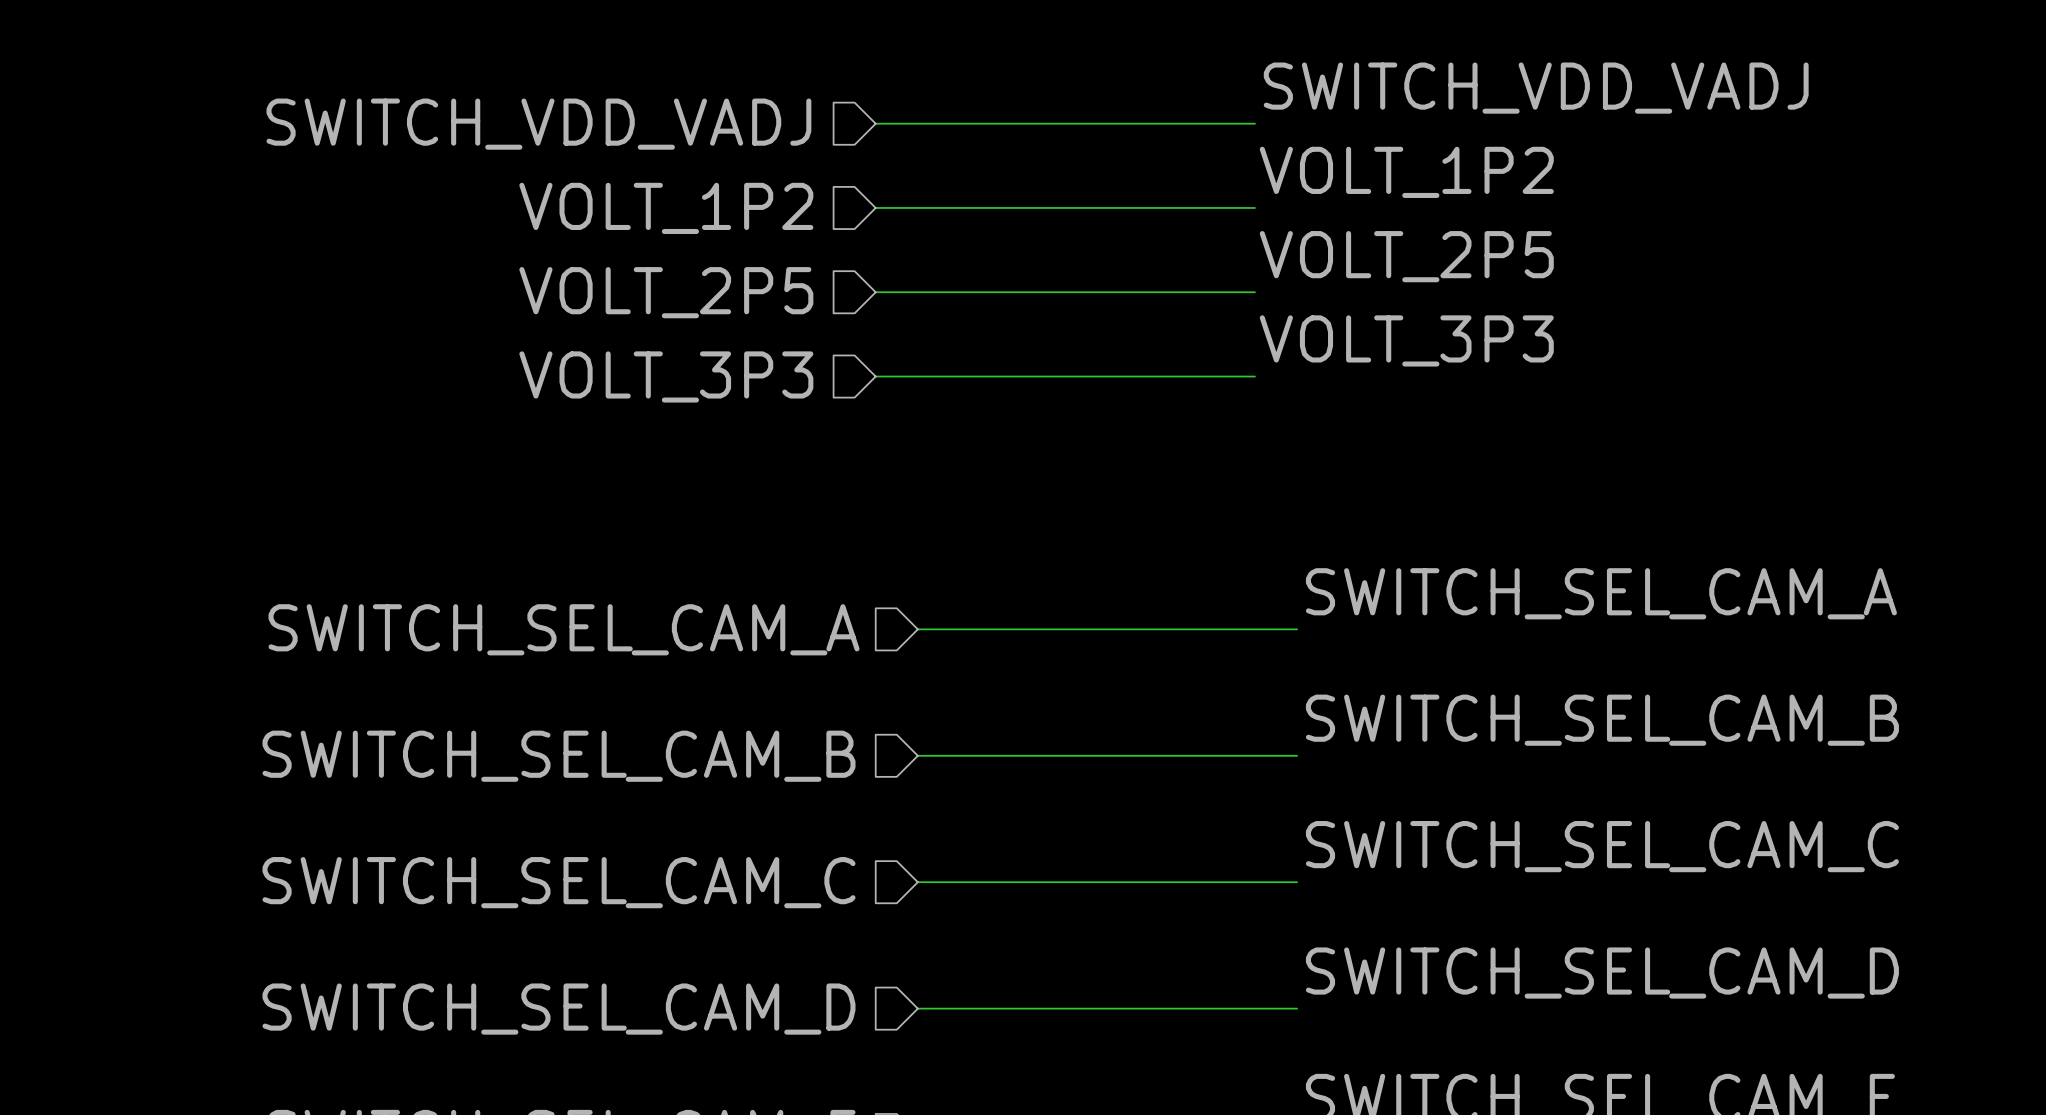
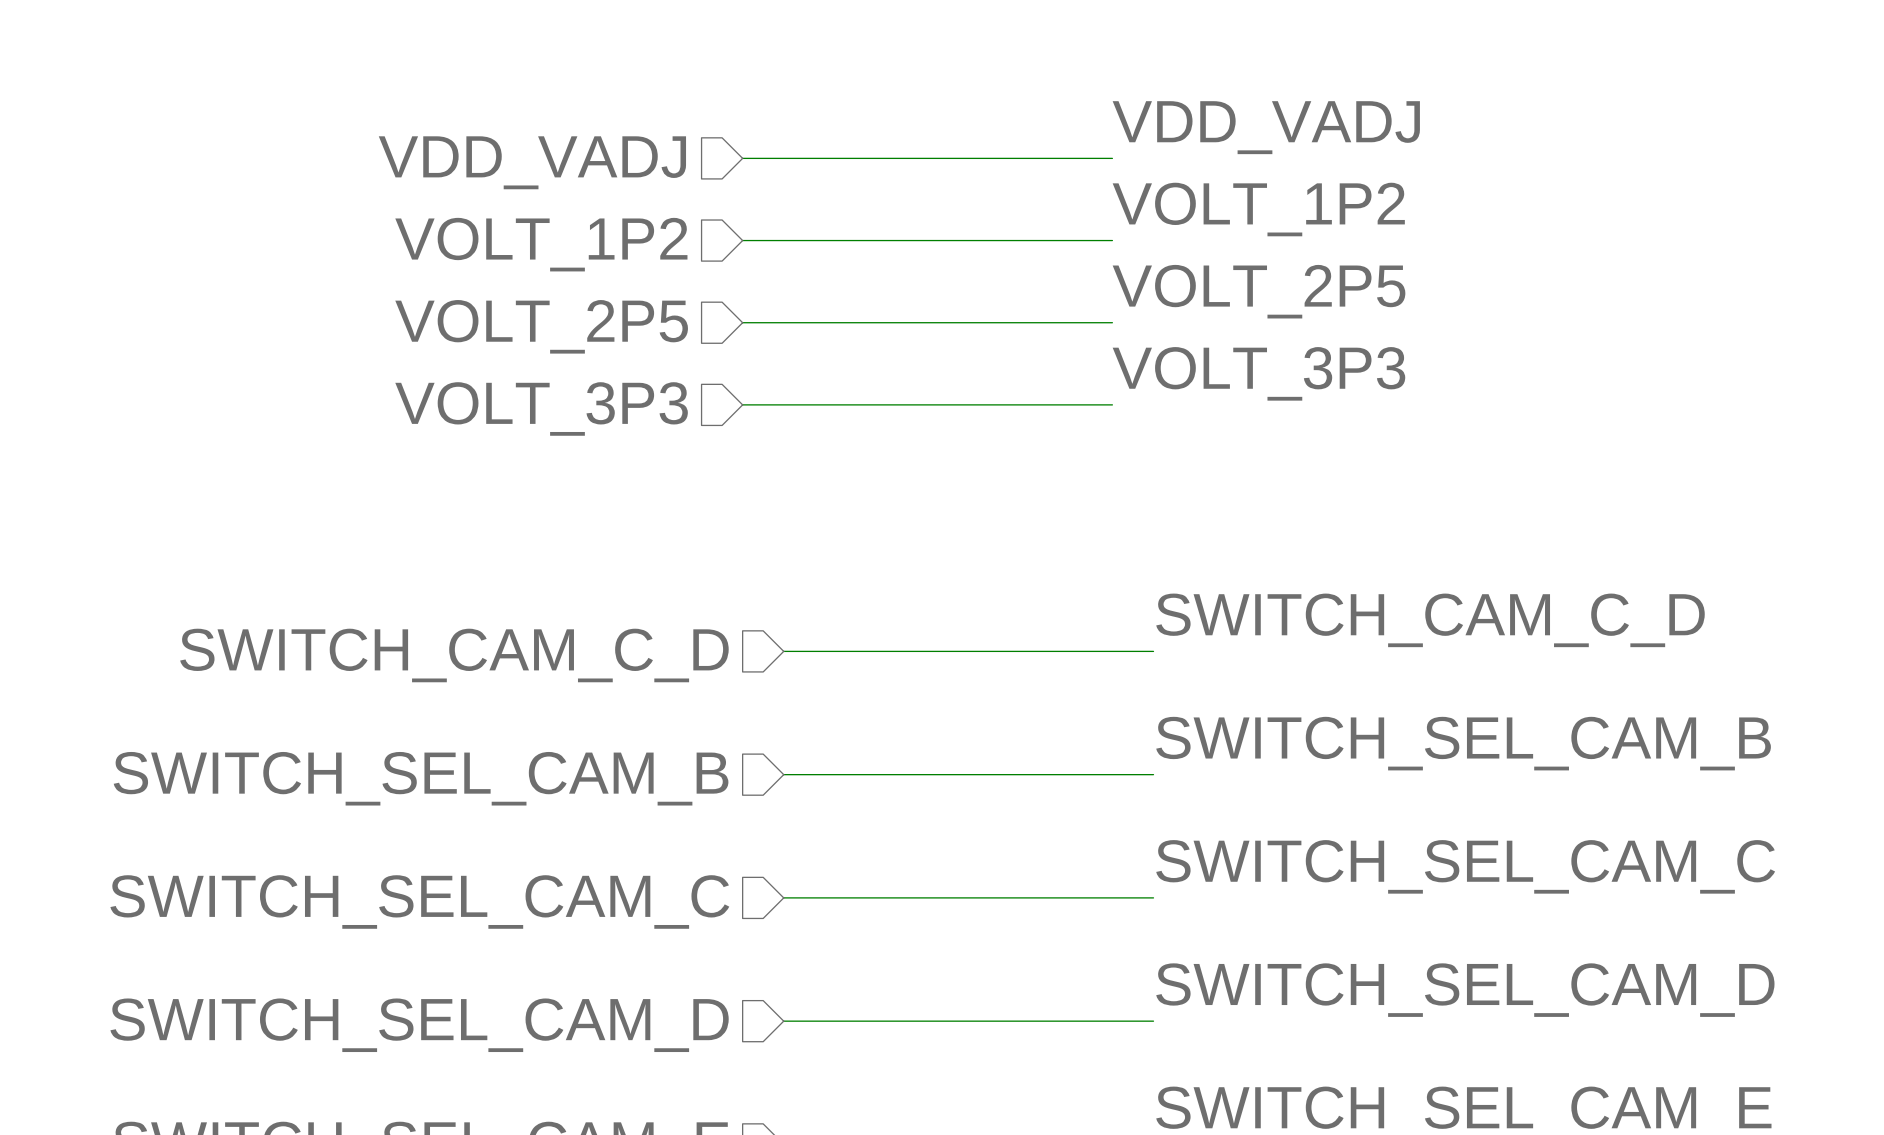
label: SWITCH_VDD_VADJ (1536, 88) -> VDD_VADJ (1266, 127)
hierarchical label: SWITCH_VDD_VADJ (538, 124) -> VDD_VADJ (532, 162)
label: SWITCH_SEL_CAM_A (1601, 593) -> SWITCH_CAM_C_D (1430, 620)
hierarchical label: SWITCH_SEL_CAM_A (564, 629) -> SWITCH_CAM_C_D (454, 655)

